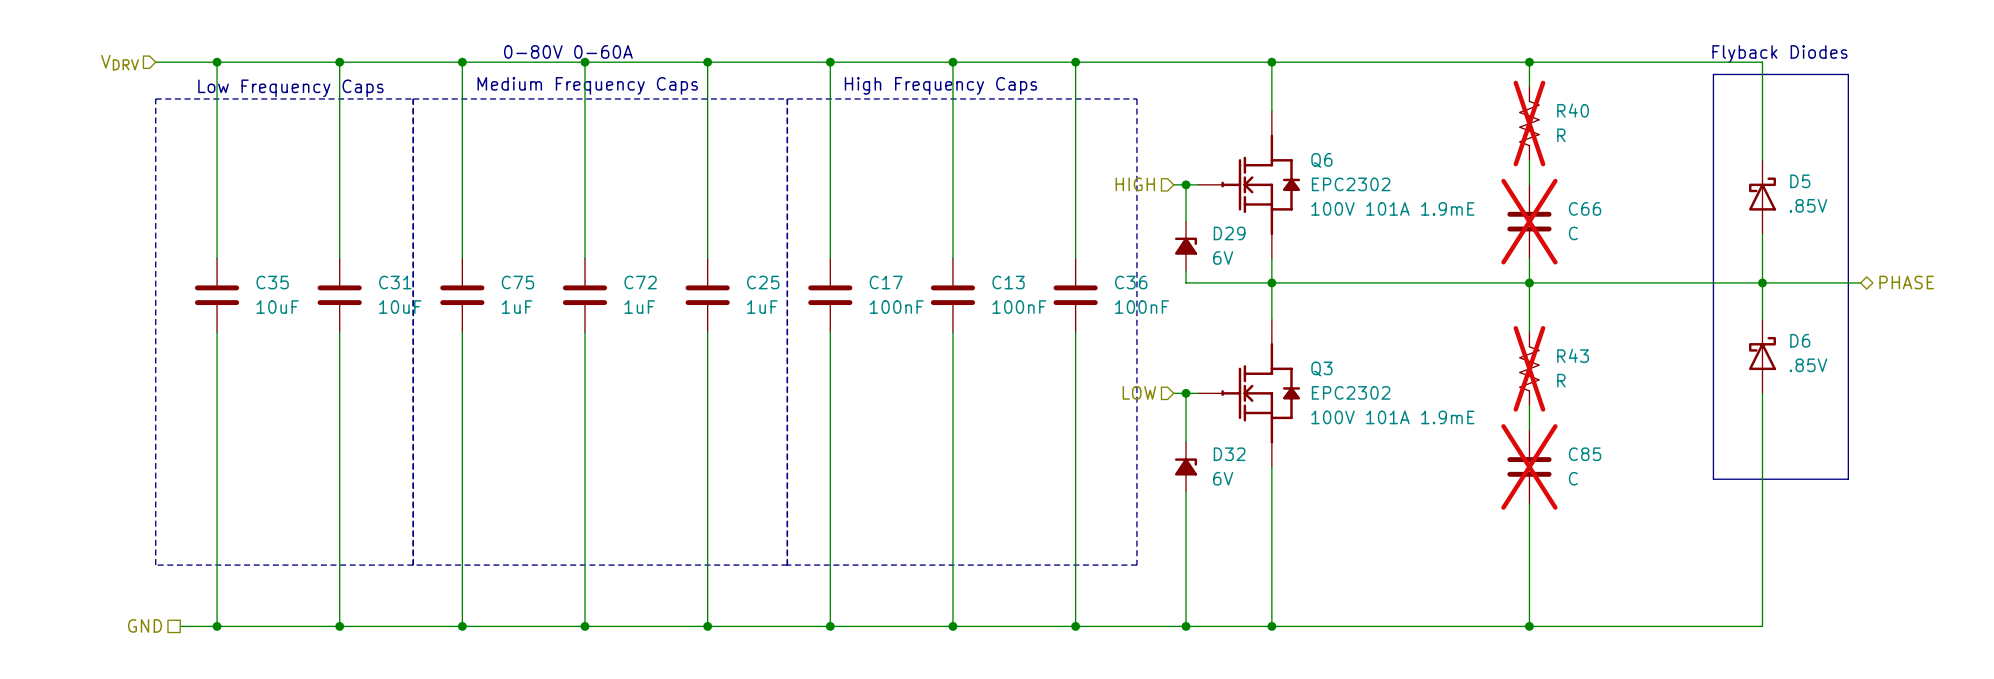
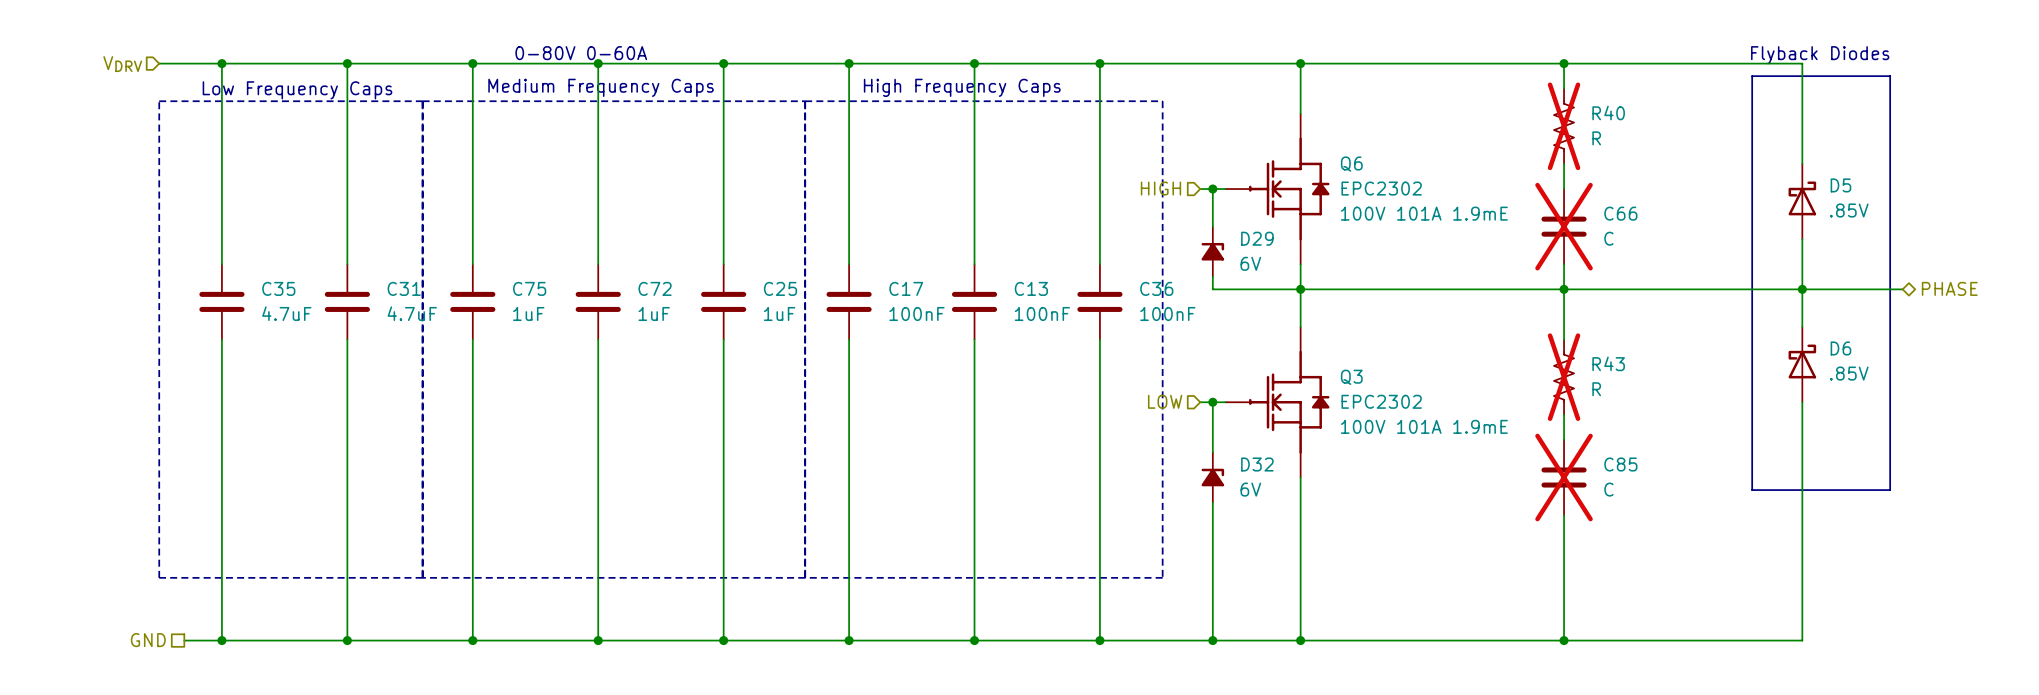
C35 value: 10uF (277, 307) -> 4.7uF (286, 313)
C31 value: 10uF (400, 307) -> 4.7uF (412, 313)

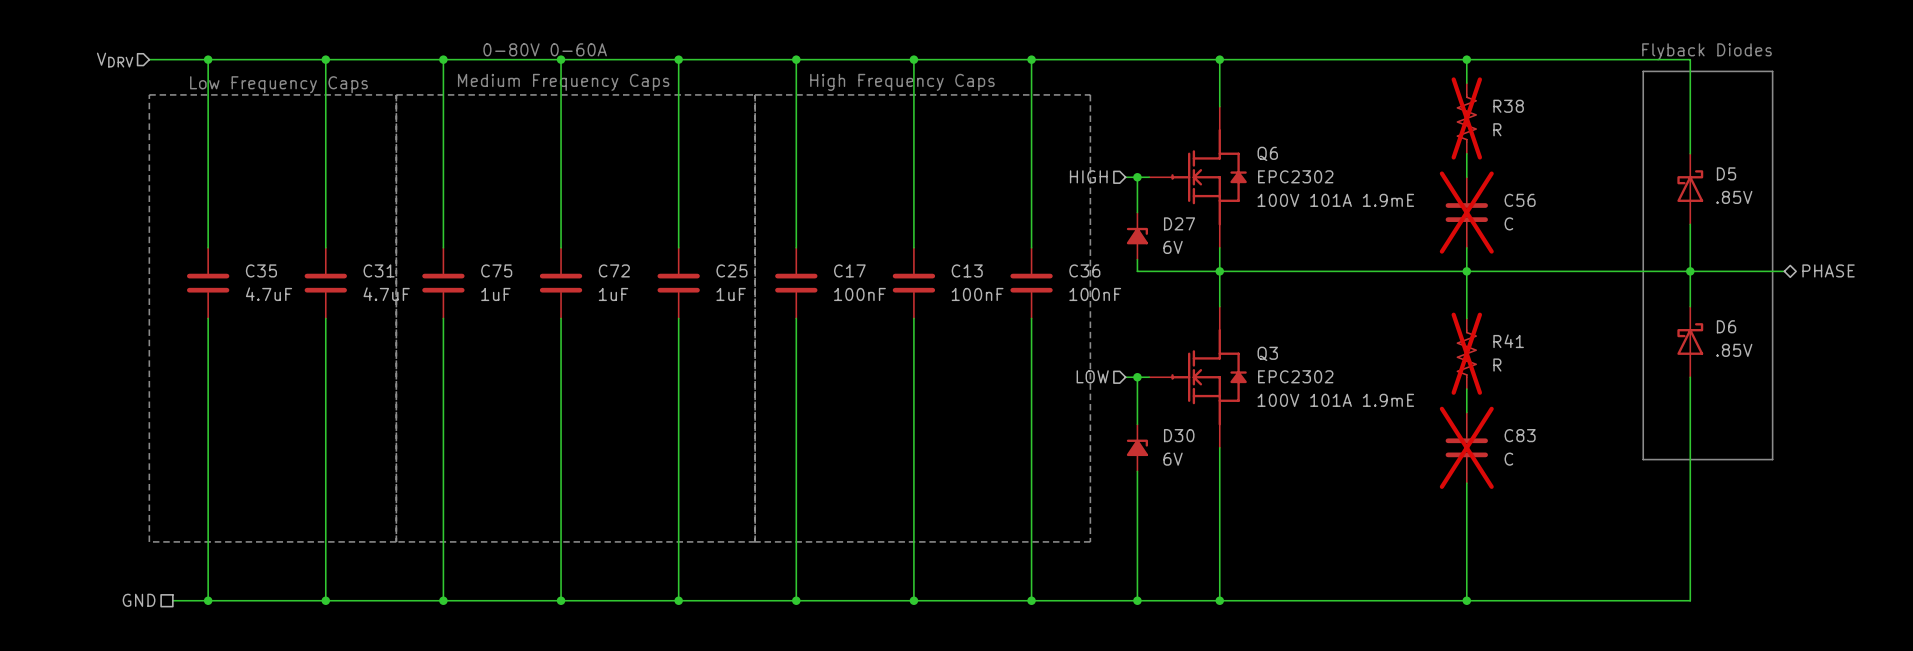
R40 name: R40 (1608, 113) -> R38 (1508, 106)
C66 name: C66 (1620, 213) -> C56 (1520, 200)
D29 name: D29 (1257, 238) -> D27 (1179, 223)
R43 name: R43 (1608, 363) -> R41 (1508, 341)
D32 name: D32 (1257, 464) -> D30 (1179, 435)
C85 name: C85 (1620, 464) -> C83 (1520, 435)

